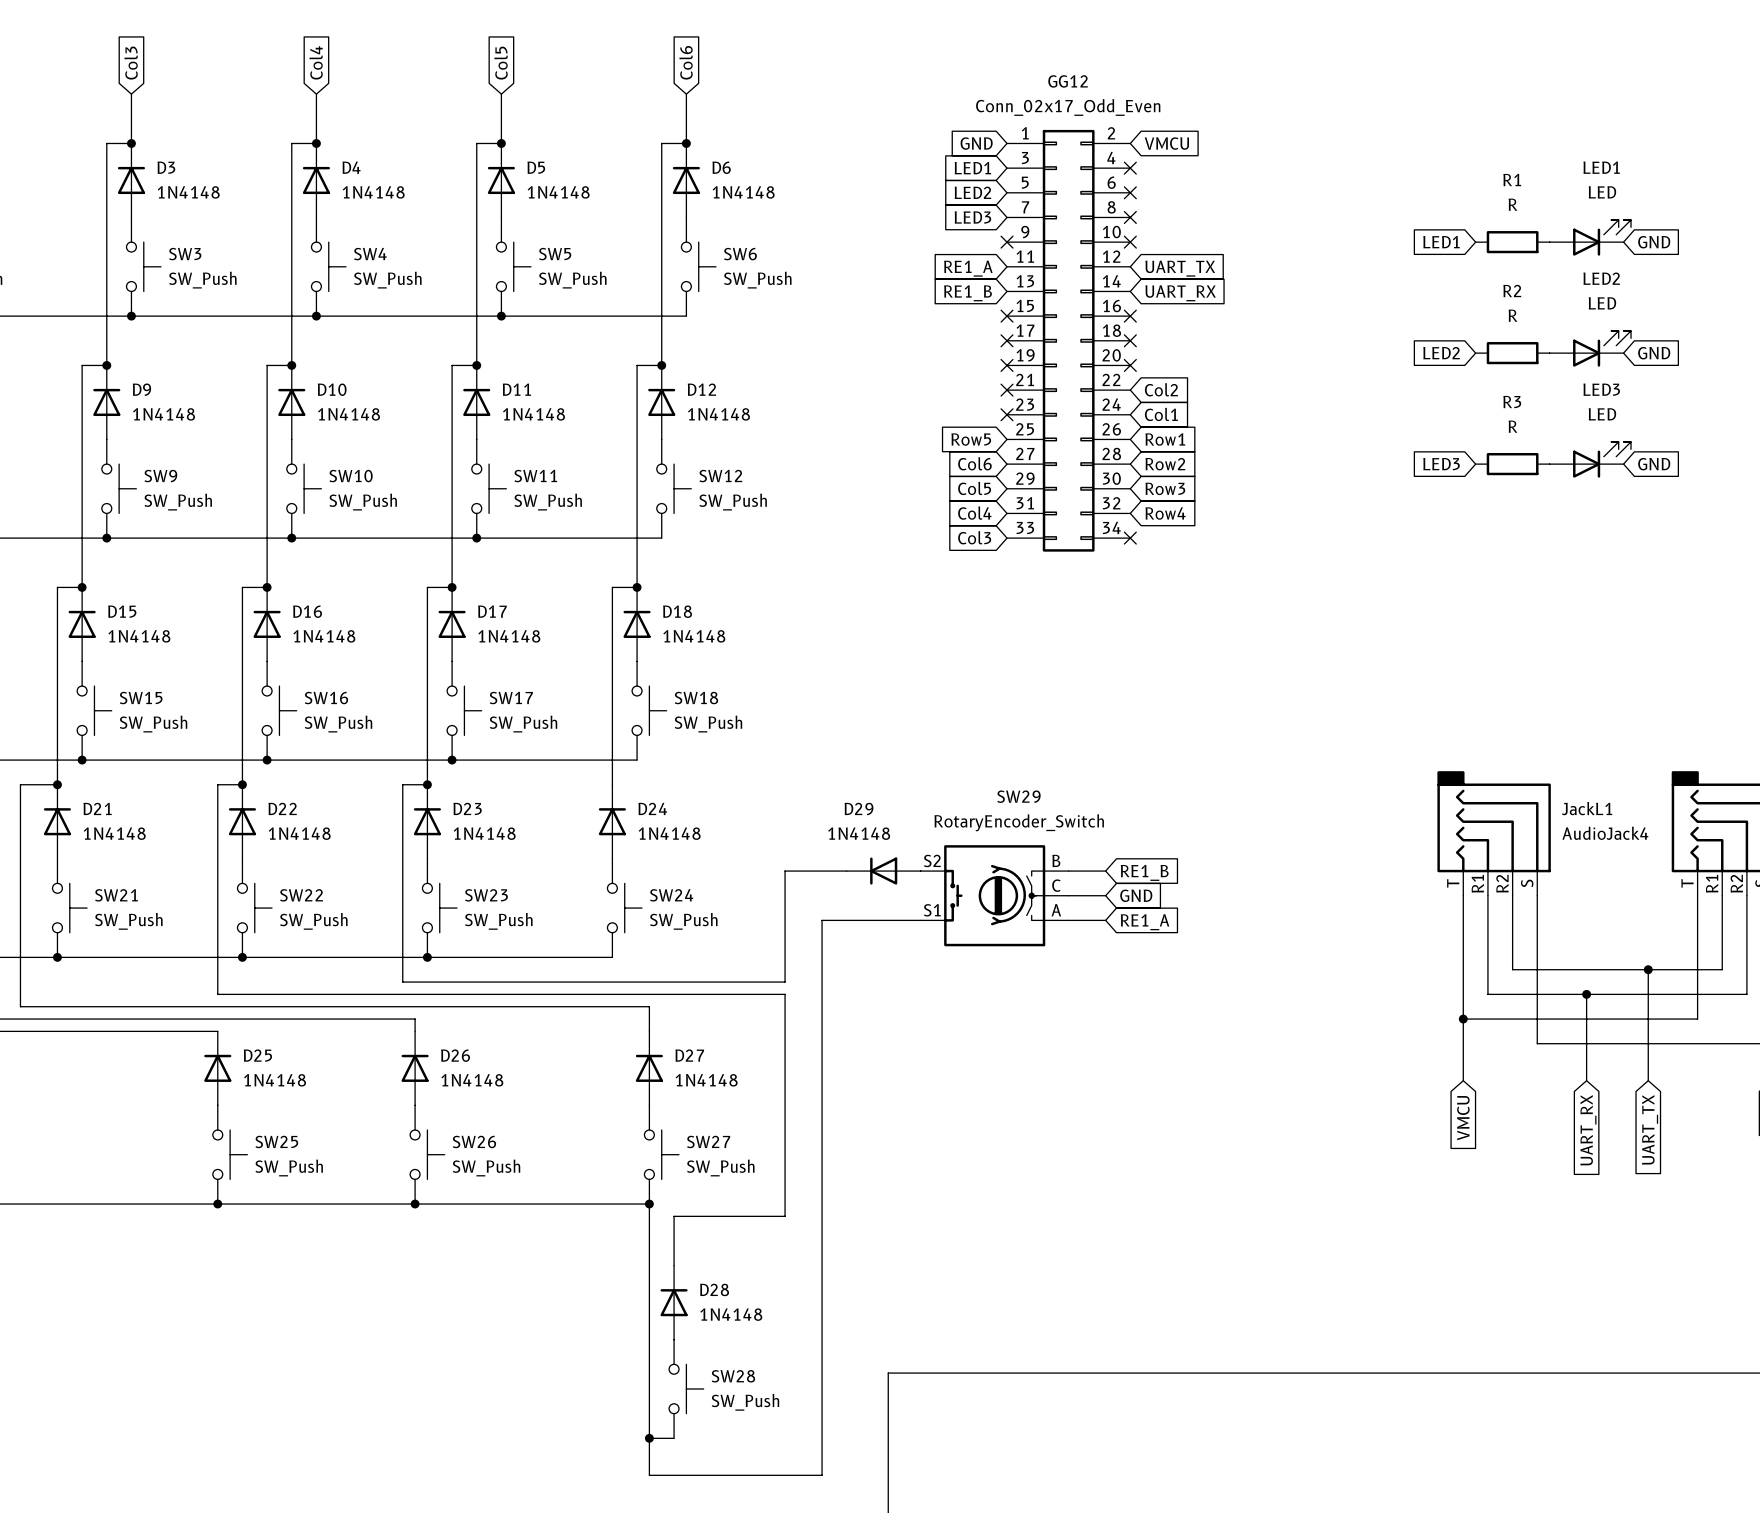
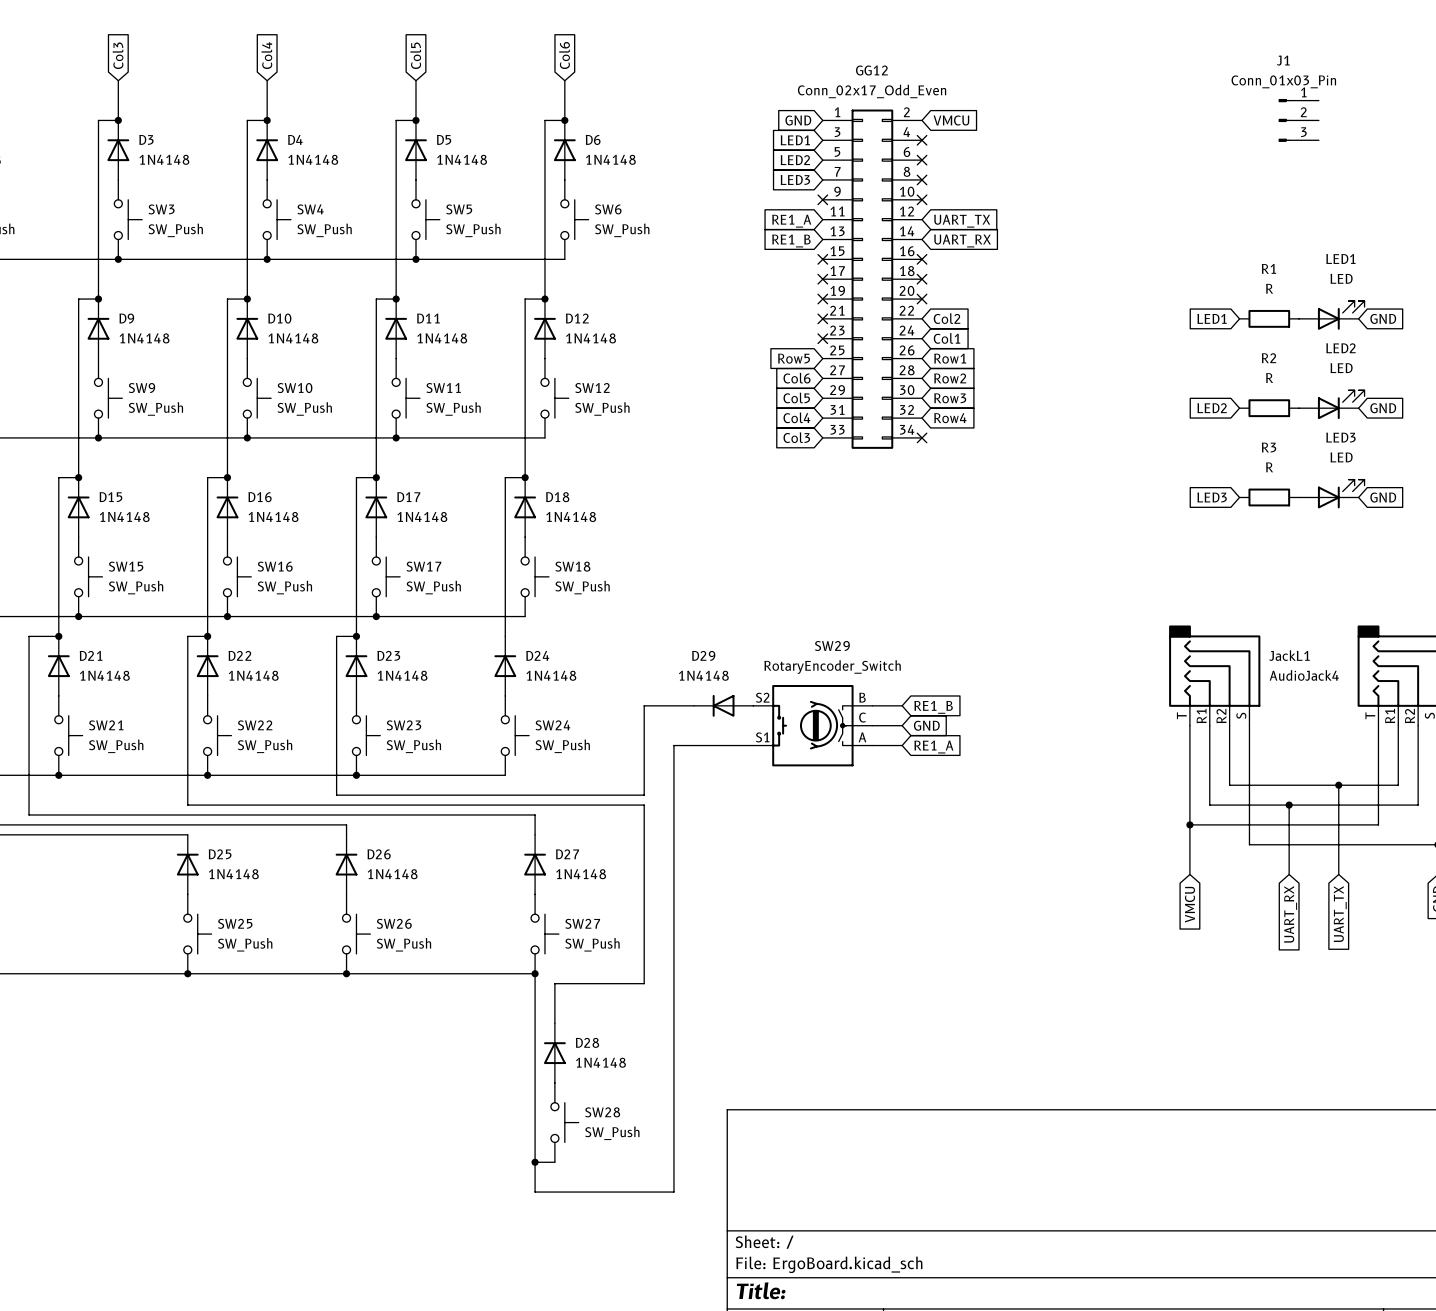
J1: none -> Conn_01x03_Pin (1298, 120)
LED1 position: (1590, 237) -> (1331, 315)
global label position: LED1 (1441, 242) -> LED1 (1212, 318)
R1 position: (1512, 242) -> (1269, 318)
global label: GND (1654, 242) -> none
LED2 position: (1590, 348) -> (1331, 404)
global label position: LED2 (1441, 353) -> LED2 (1212, 408)
R2 position: (1512, 353) -> (1269, 408)
global label: GND (1654, 353) -> none
global label: none -> GND (1383, 318)
LED3 position: (1590, 459) -> (1331, 494)
global label position: LED3 (1441, 464) -> LED3 (1212, 497)
R3 position: (1512, 464) -> (1269, 497)
global label: GND (1654, 464) -> none
global label: none -> GND (1383, 408)
global label: none -> GND (1383, 497)

